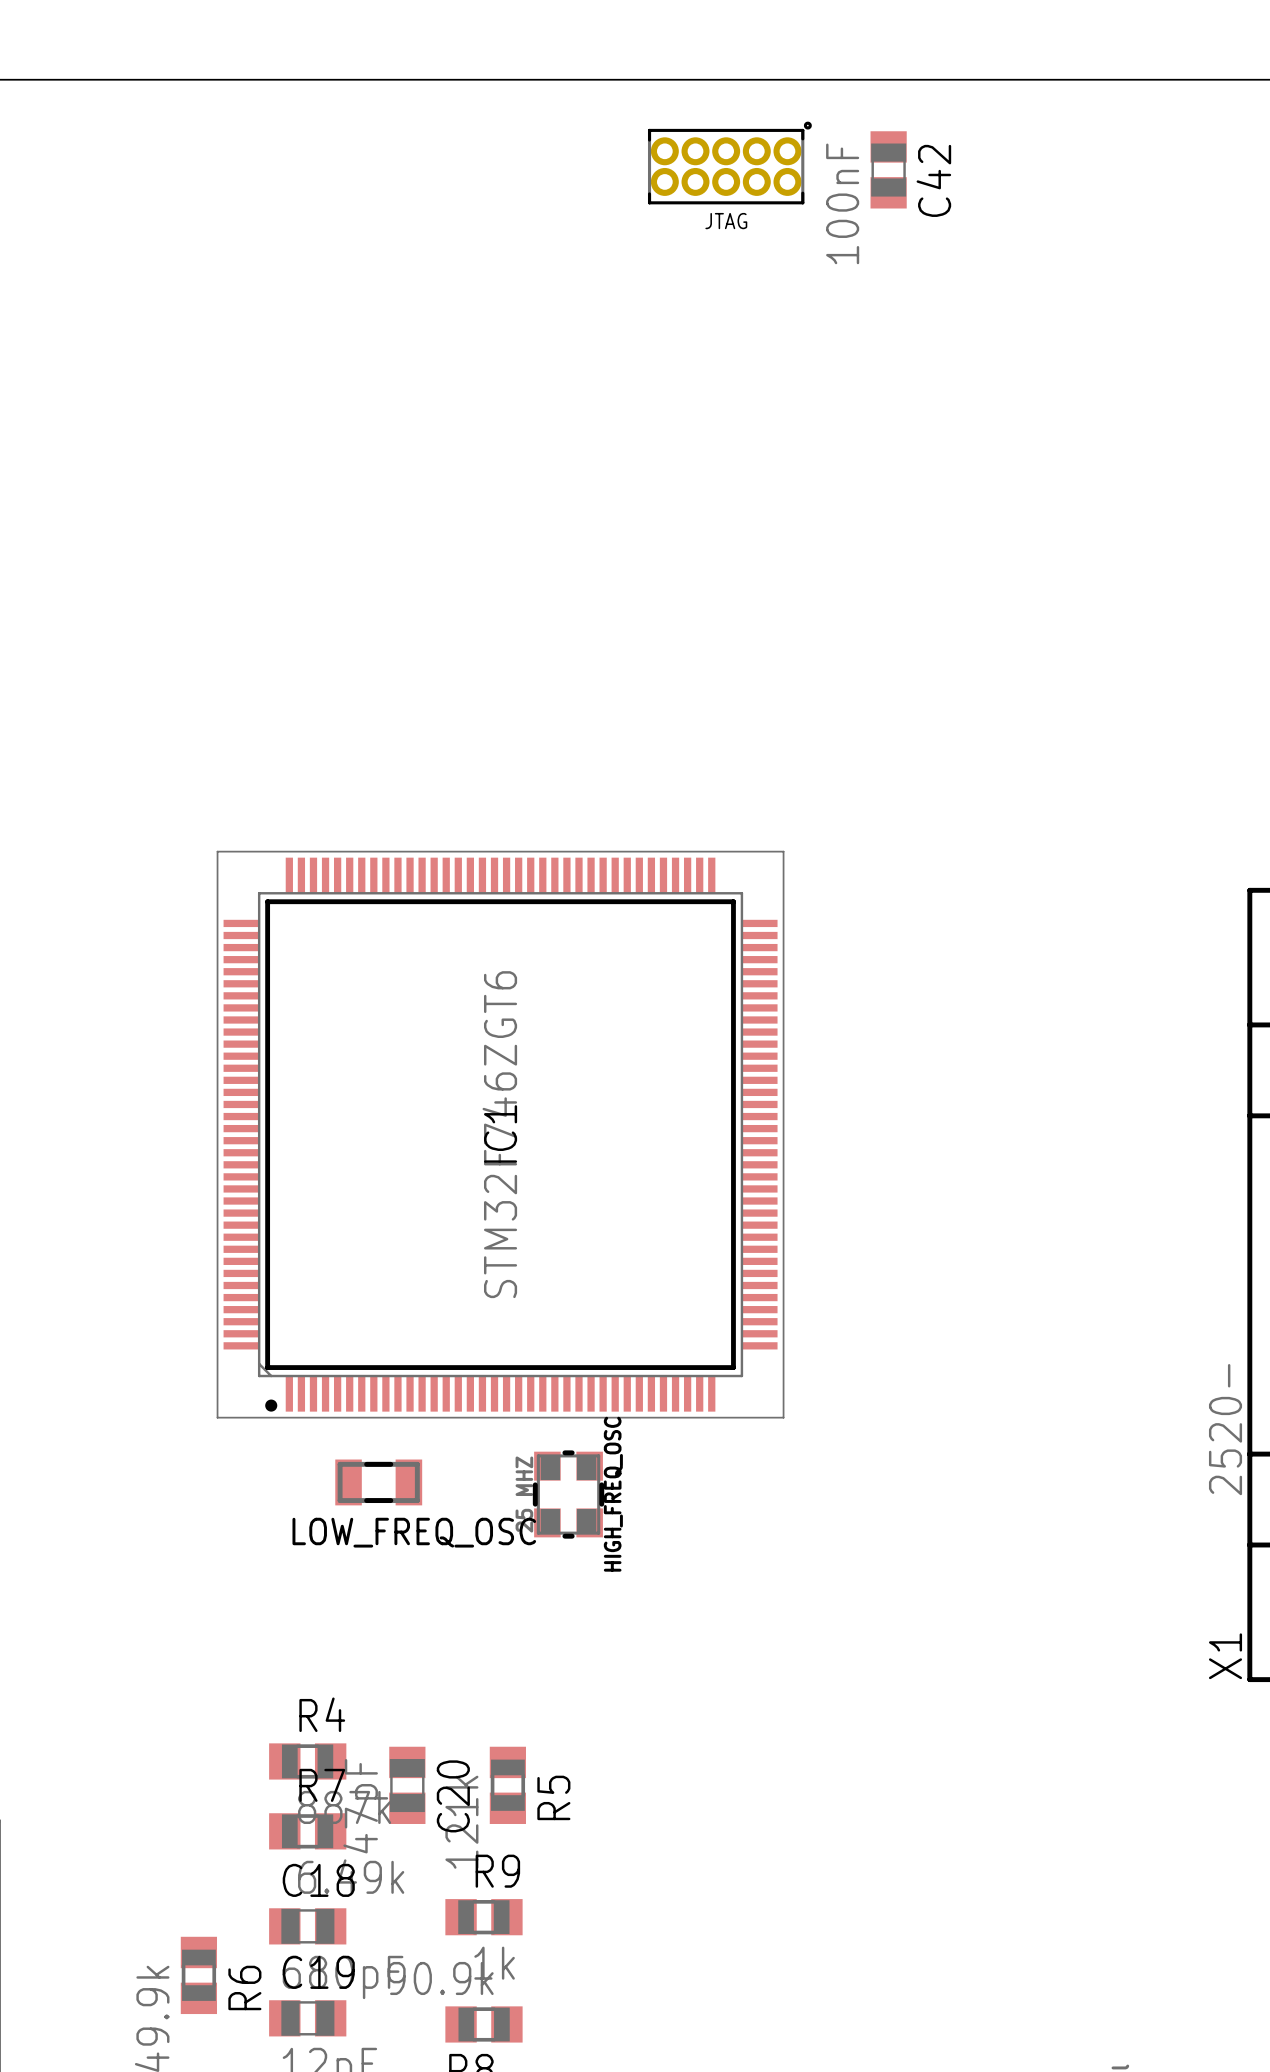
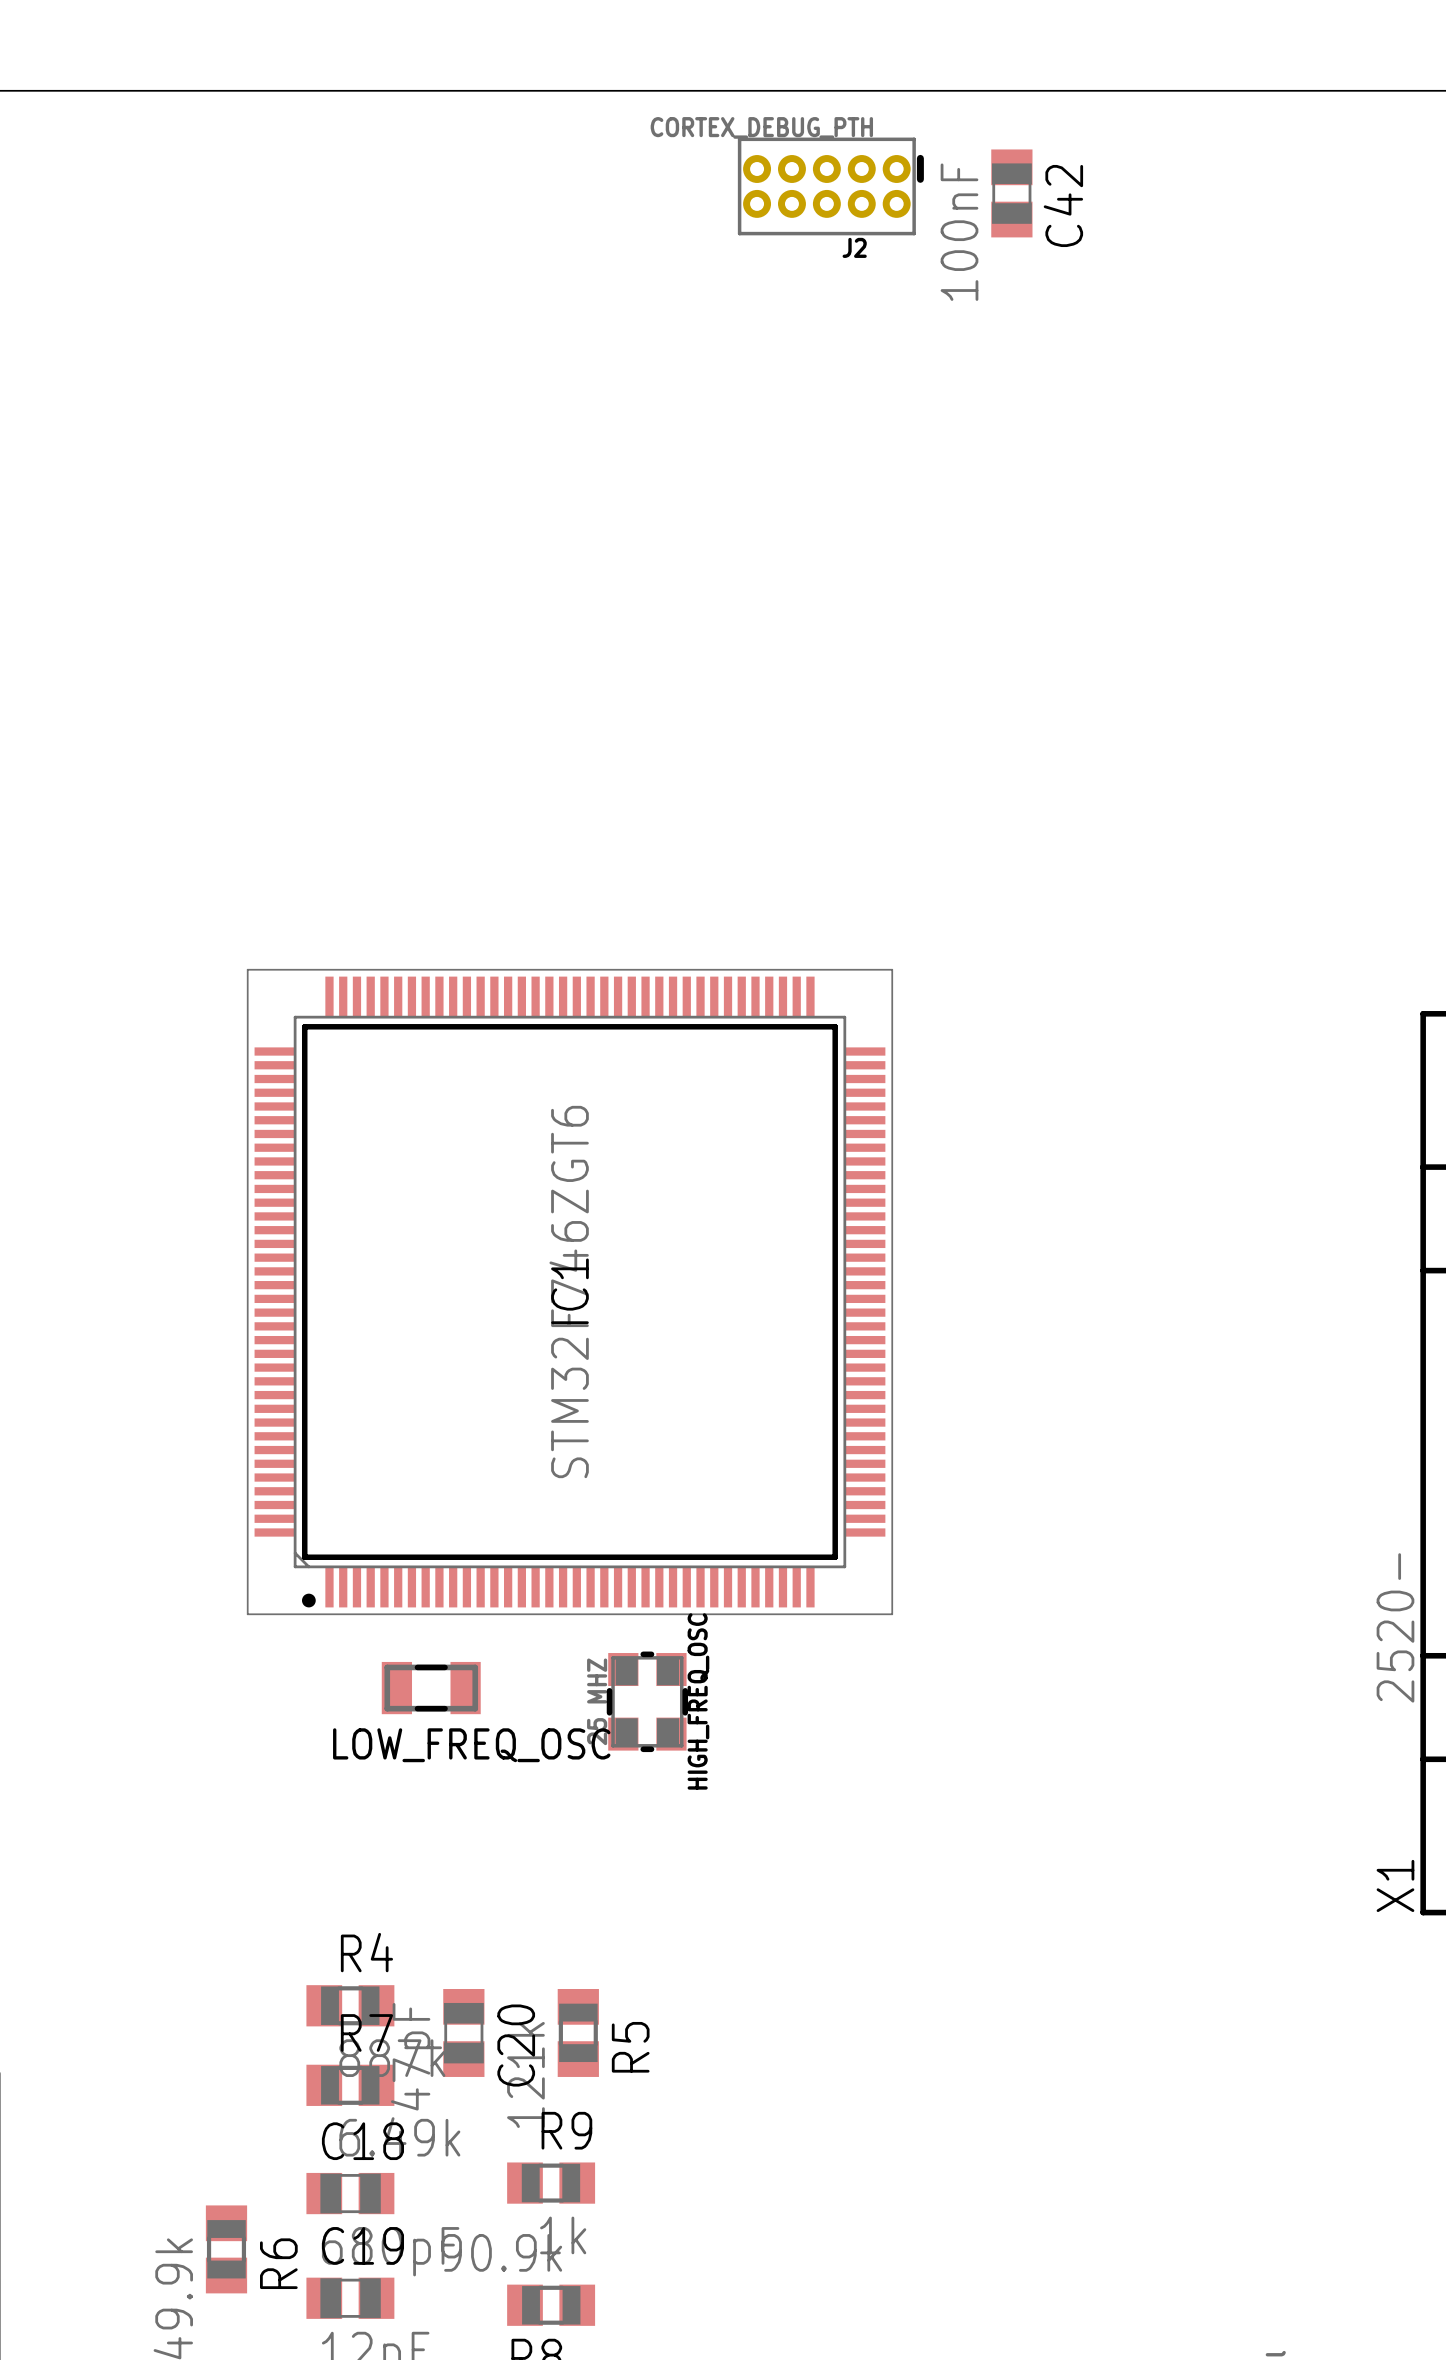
JTAG: (729, 162) -> none
J2: none -> CORTEX_DEBUG_PTH (830, 186)

